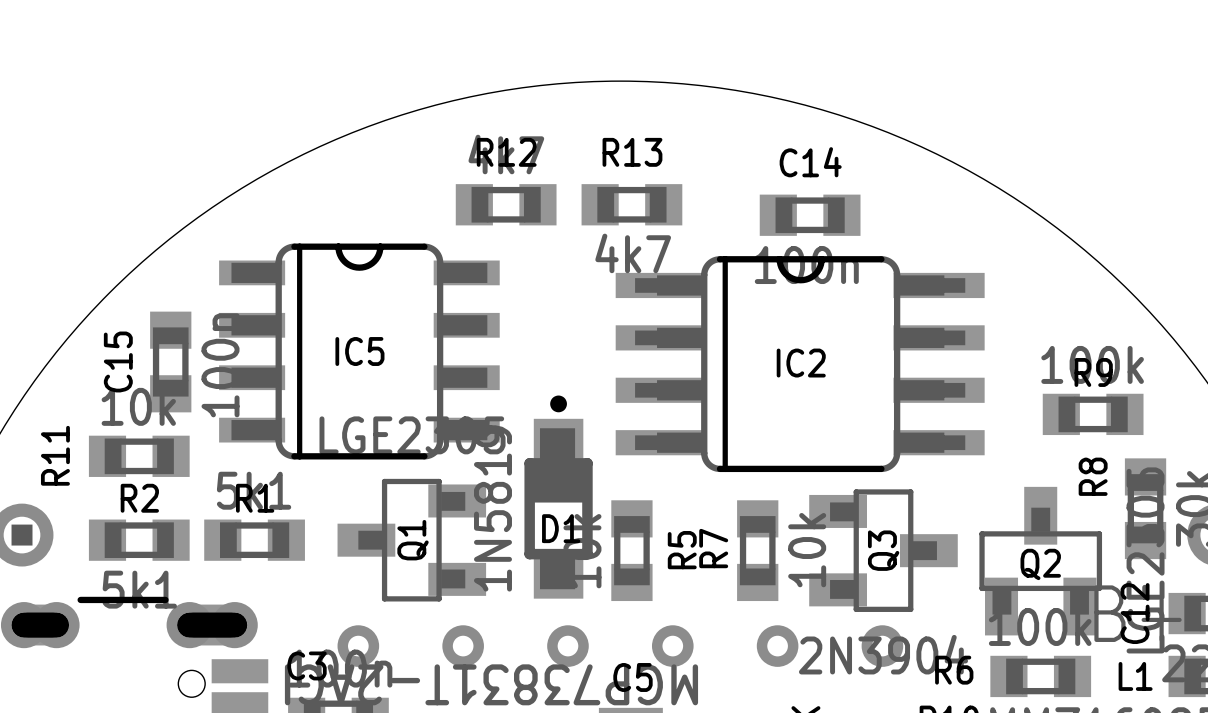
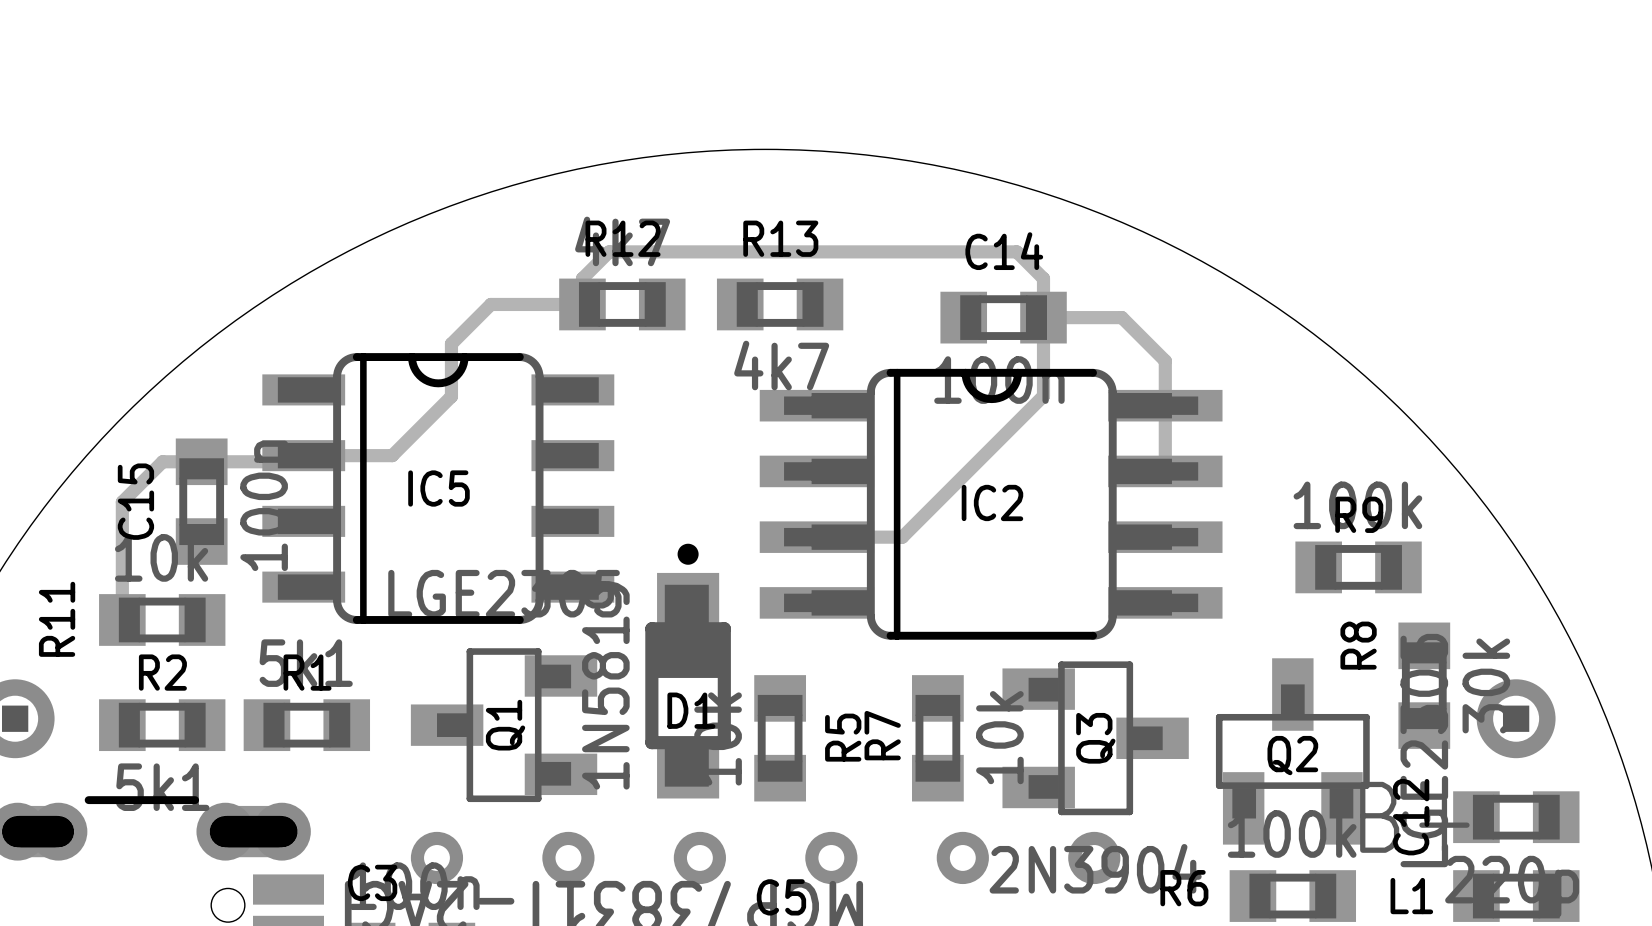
track: none -> (1043, 317) (1121, 317) (1165, 360) (1165, 471)
track: none -> (816, 537) (902, 537) (1043, 396) (1043, 278) (1016, 251) (609, 251) (582, 278) (582, 304) (490, 304) (451, 343) (451, 396) (392, 455) (303, 455) (297, 461) (162, 461) (122, 502) (122, 619)

